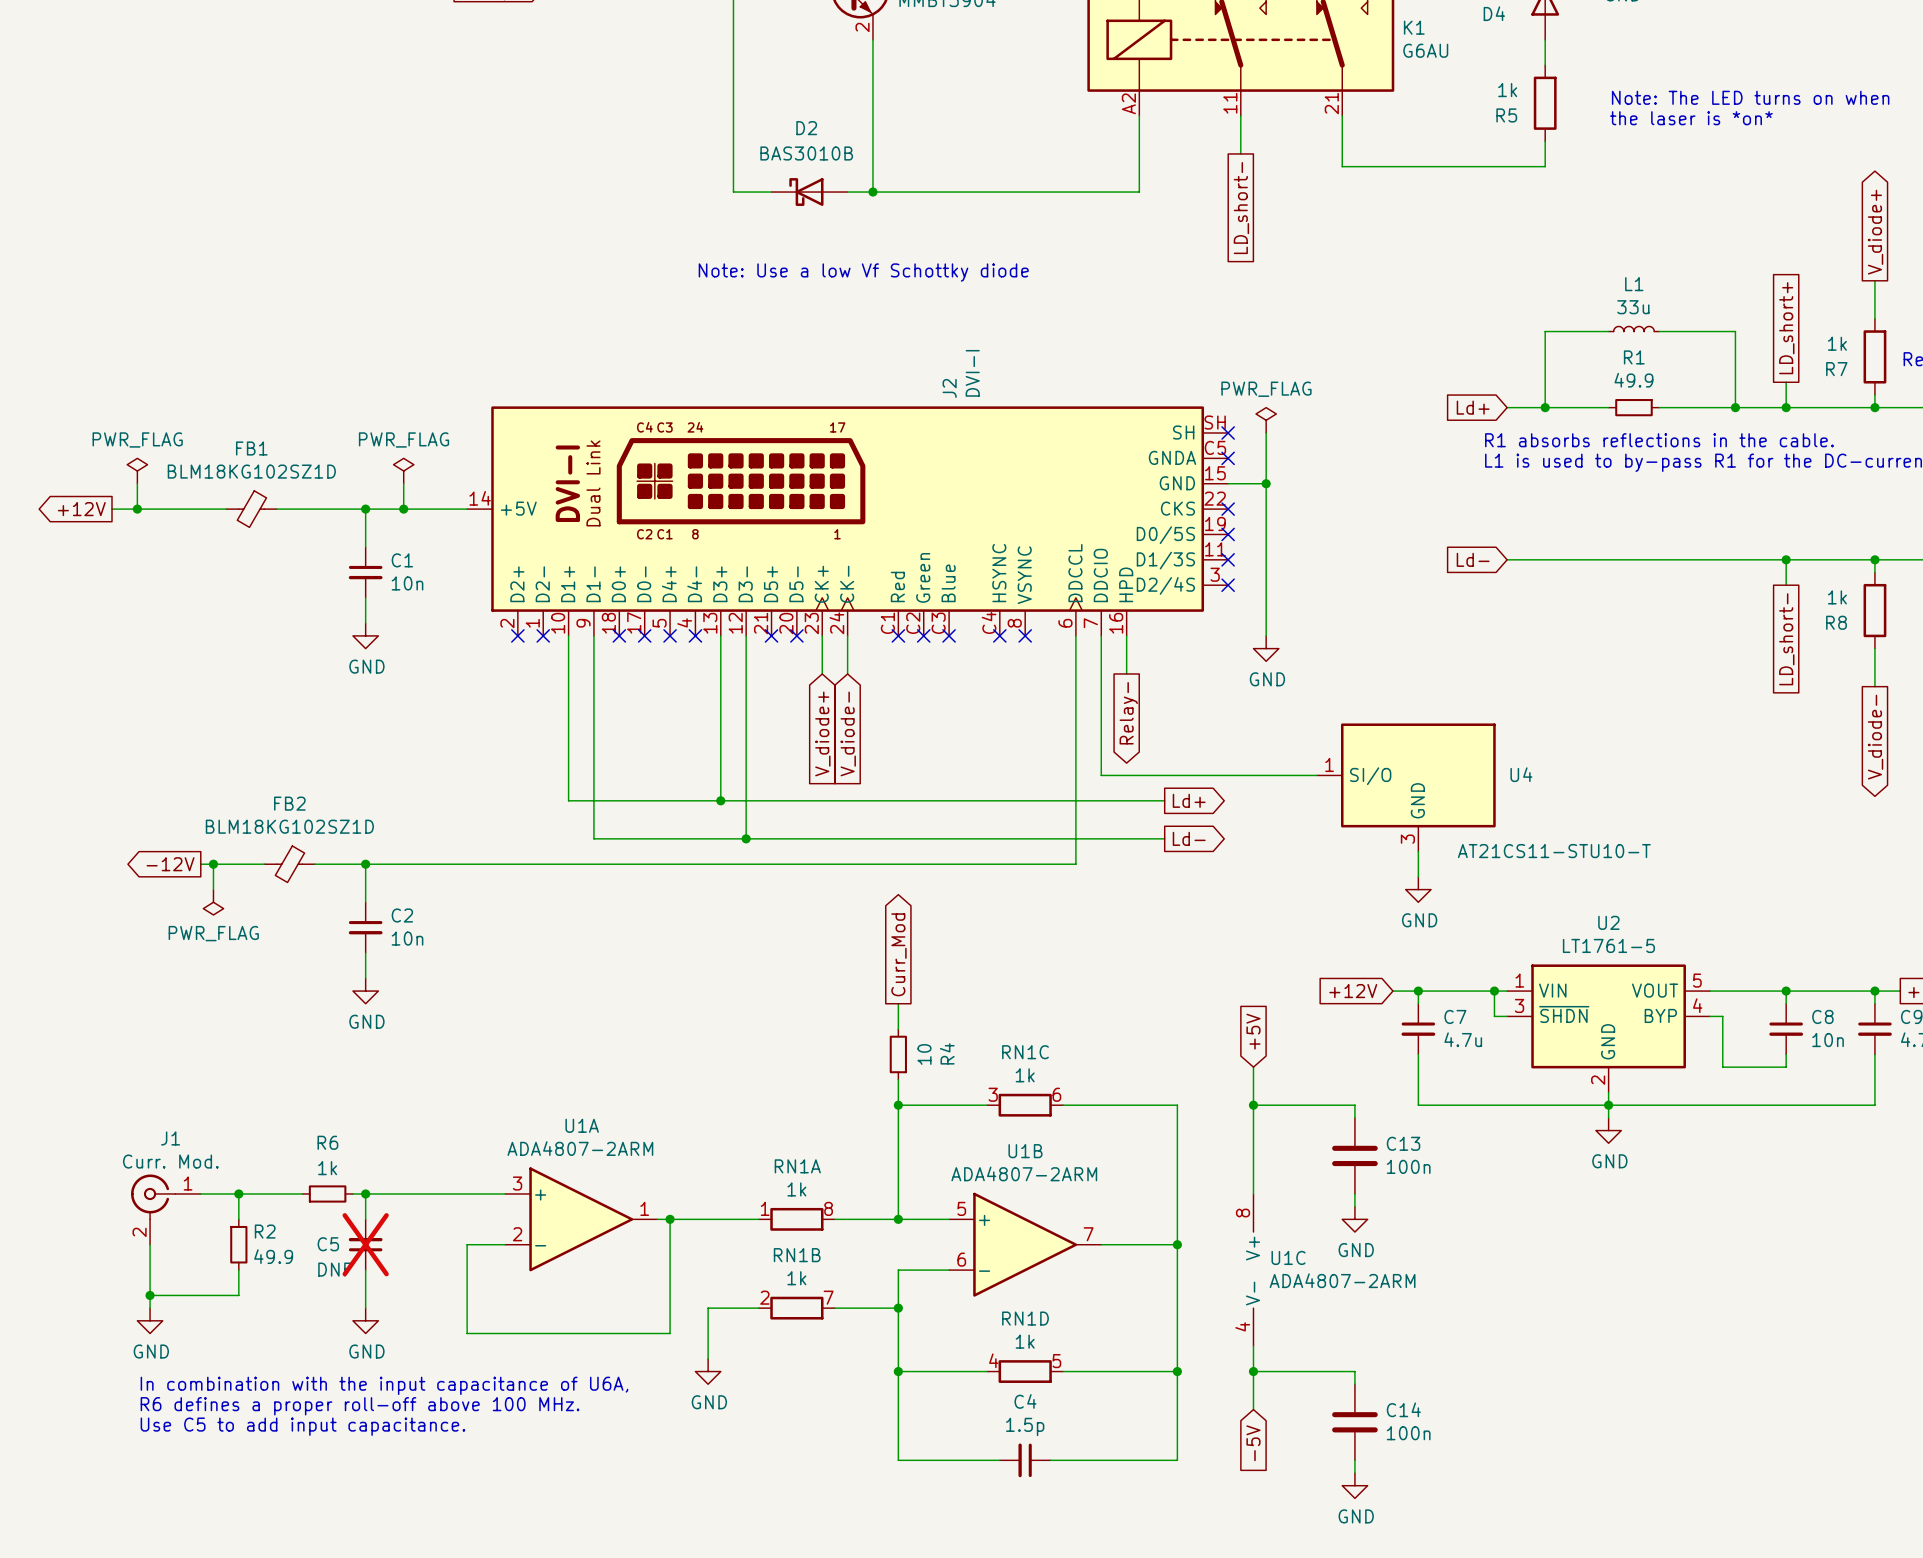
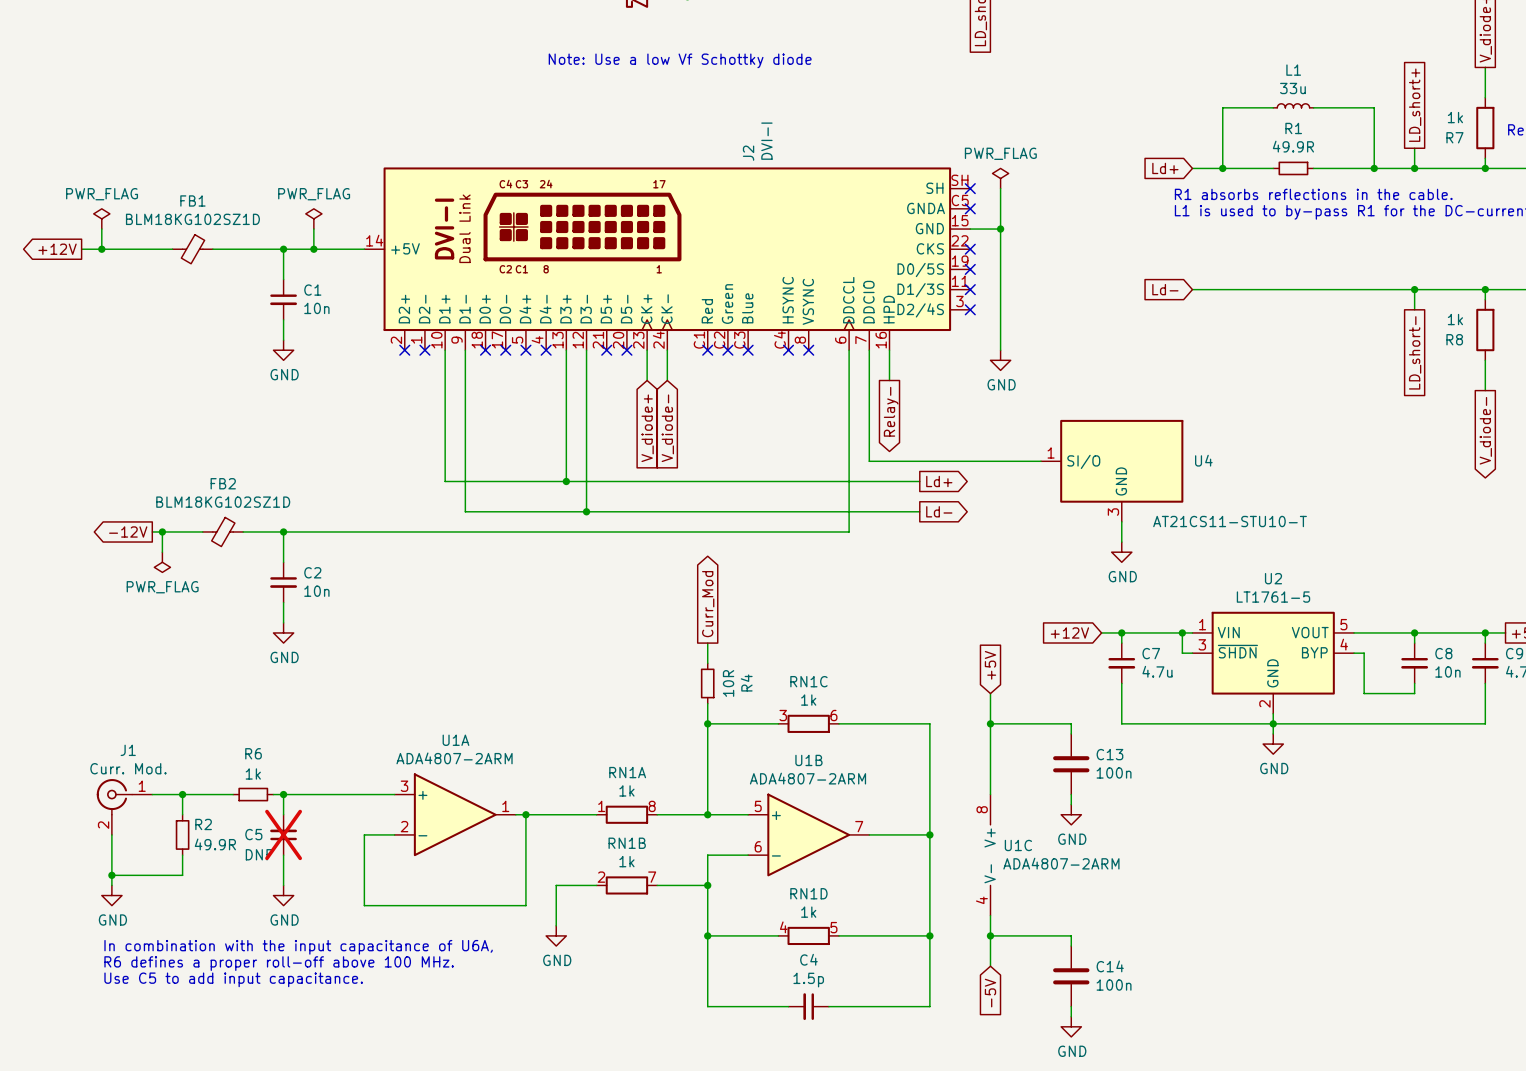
R1 value: 49.9 (1633, 380) -> 49.9R (1293, 146)
R4 value: 10 (924, 1054) -> 10R (728, 683)
R2 value: 49.9 (273, 1256) -> 49.9R (215, 844)

